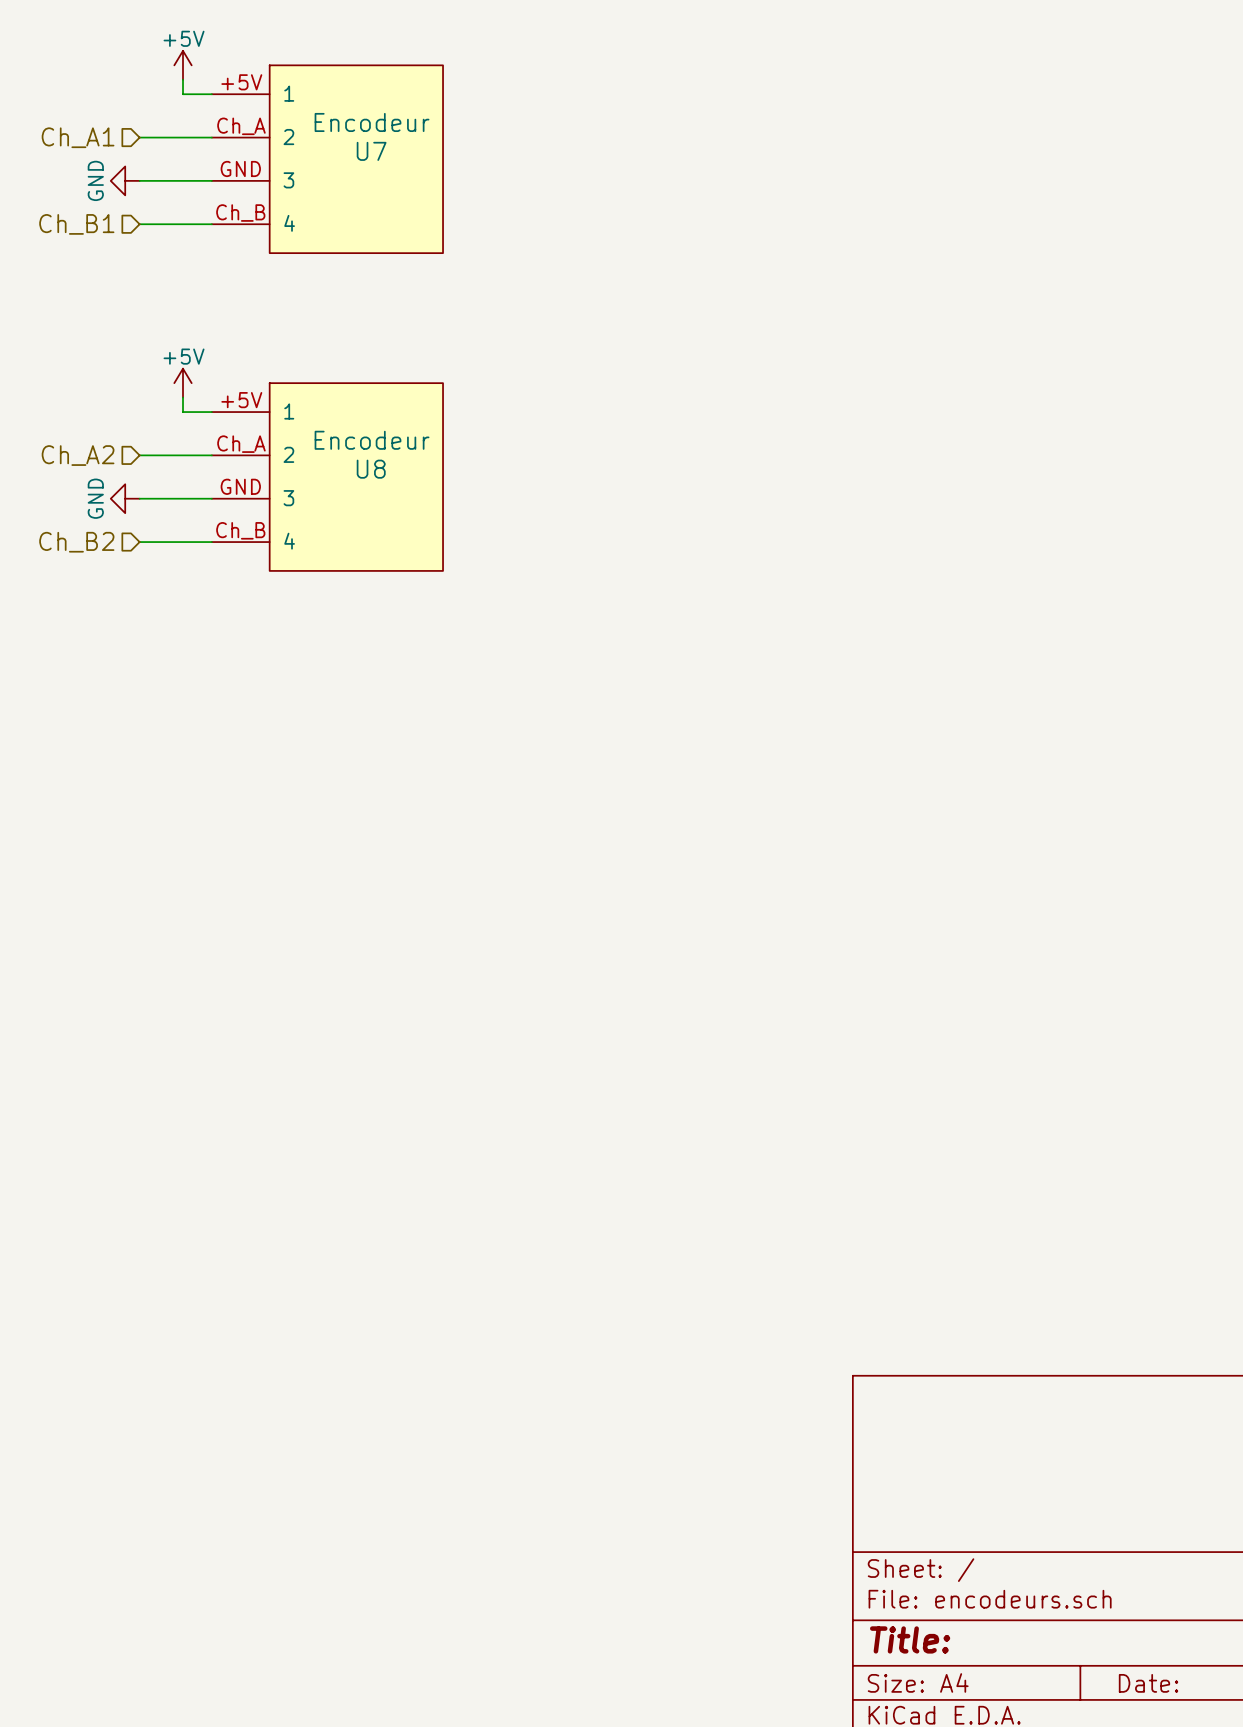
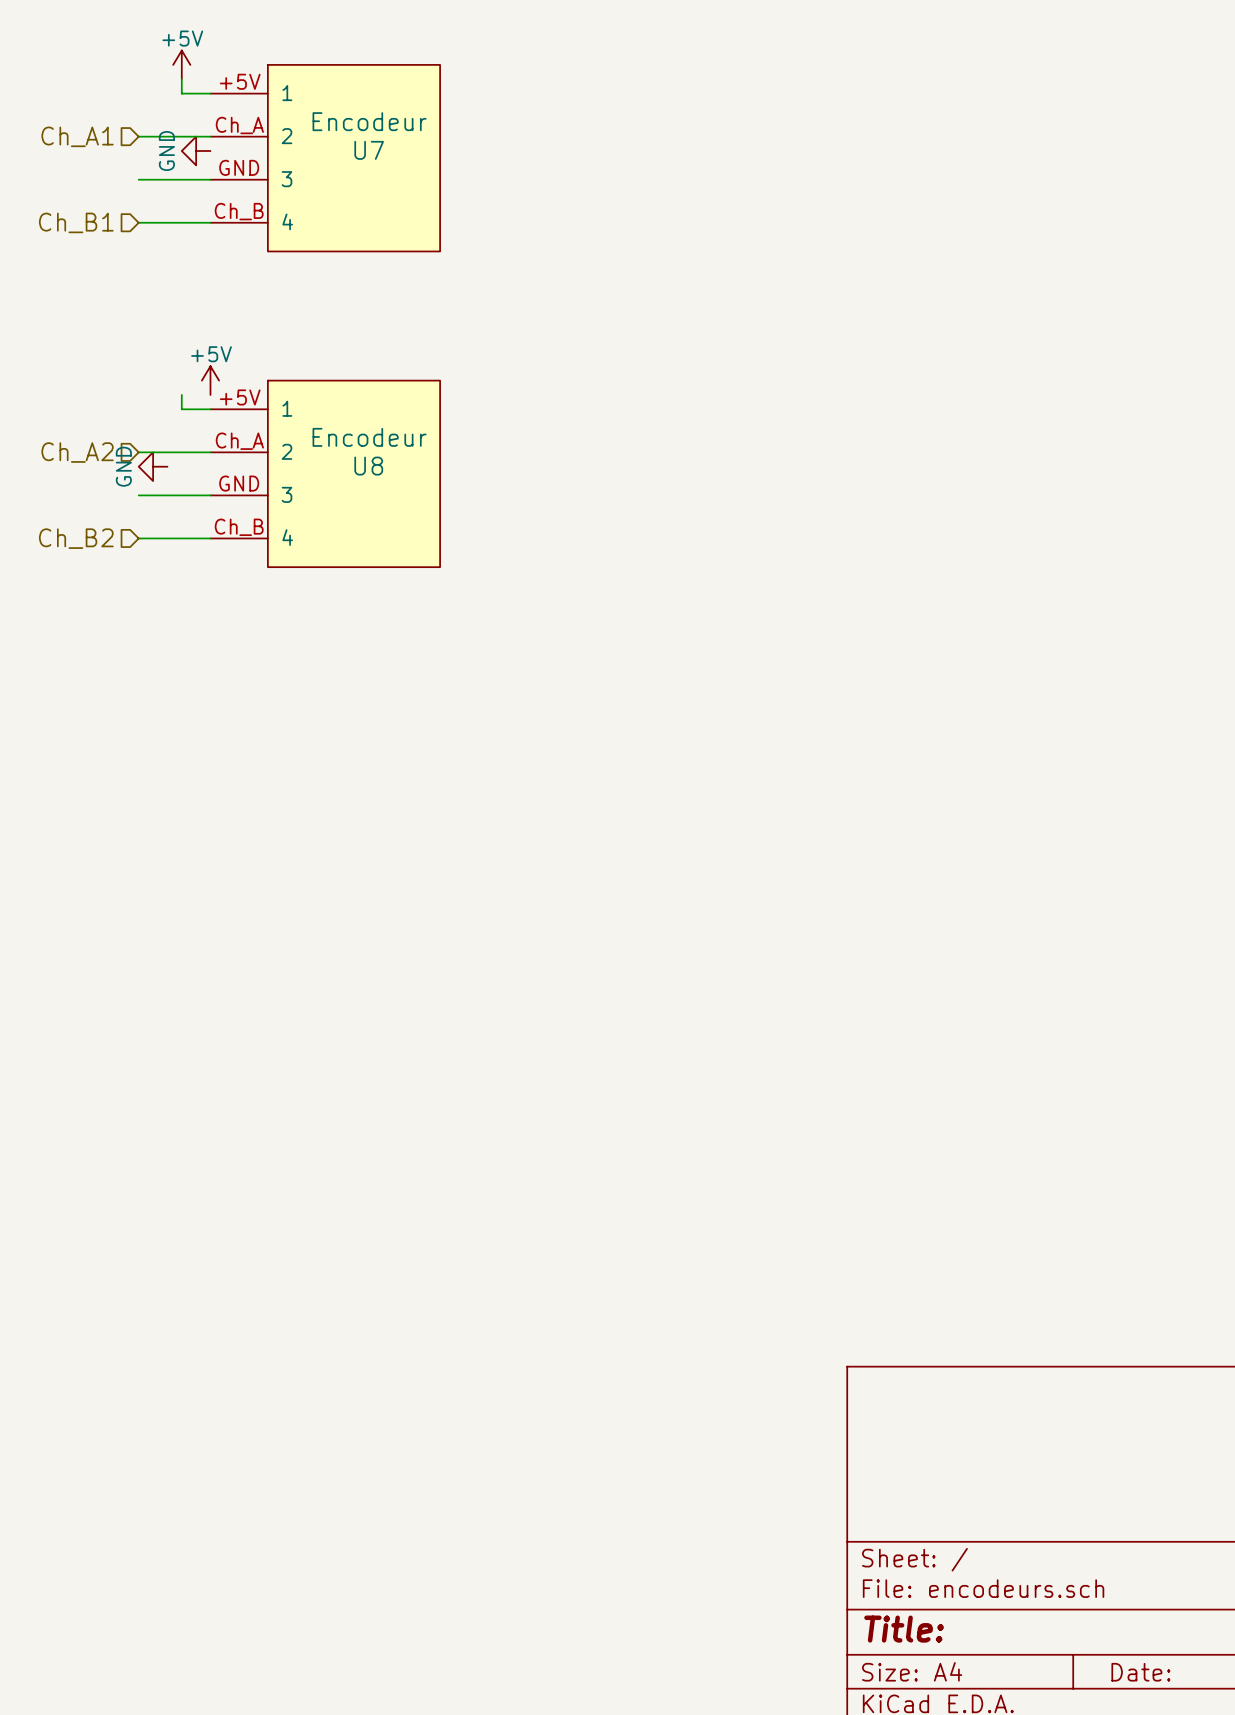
power symbol position: GND (125, 180) -> GND (196, 151)
power symbol position: +5V (183, 383) -> +5V (210, 380)
power symbol position: GND (125, 498) -> GND (153, 466)

